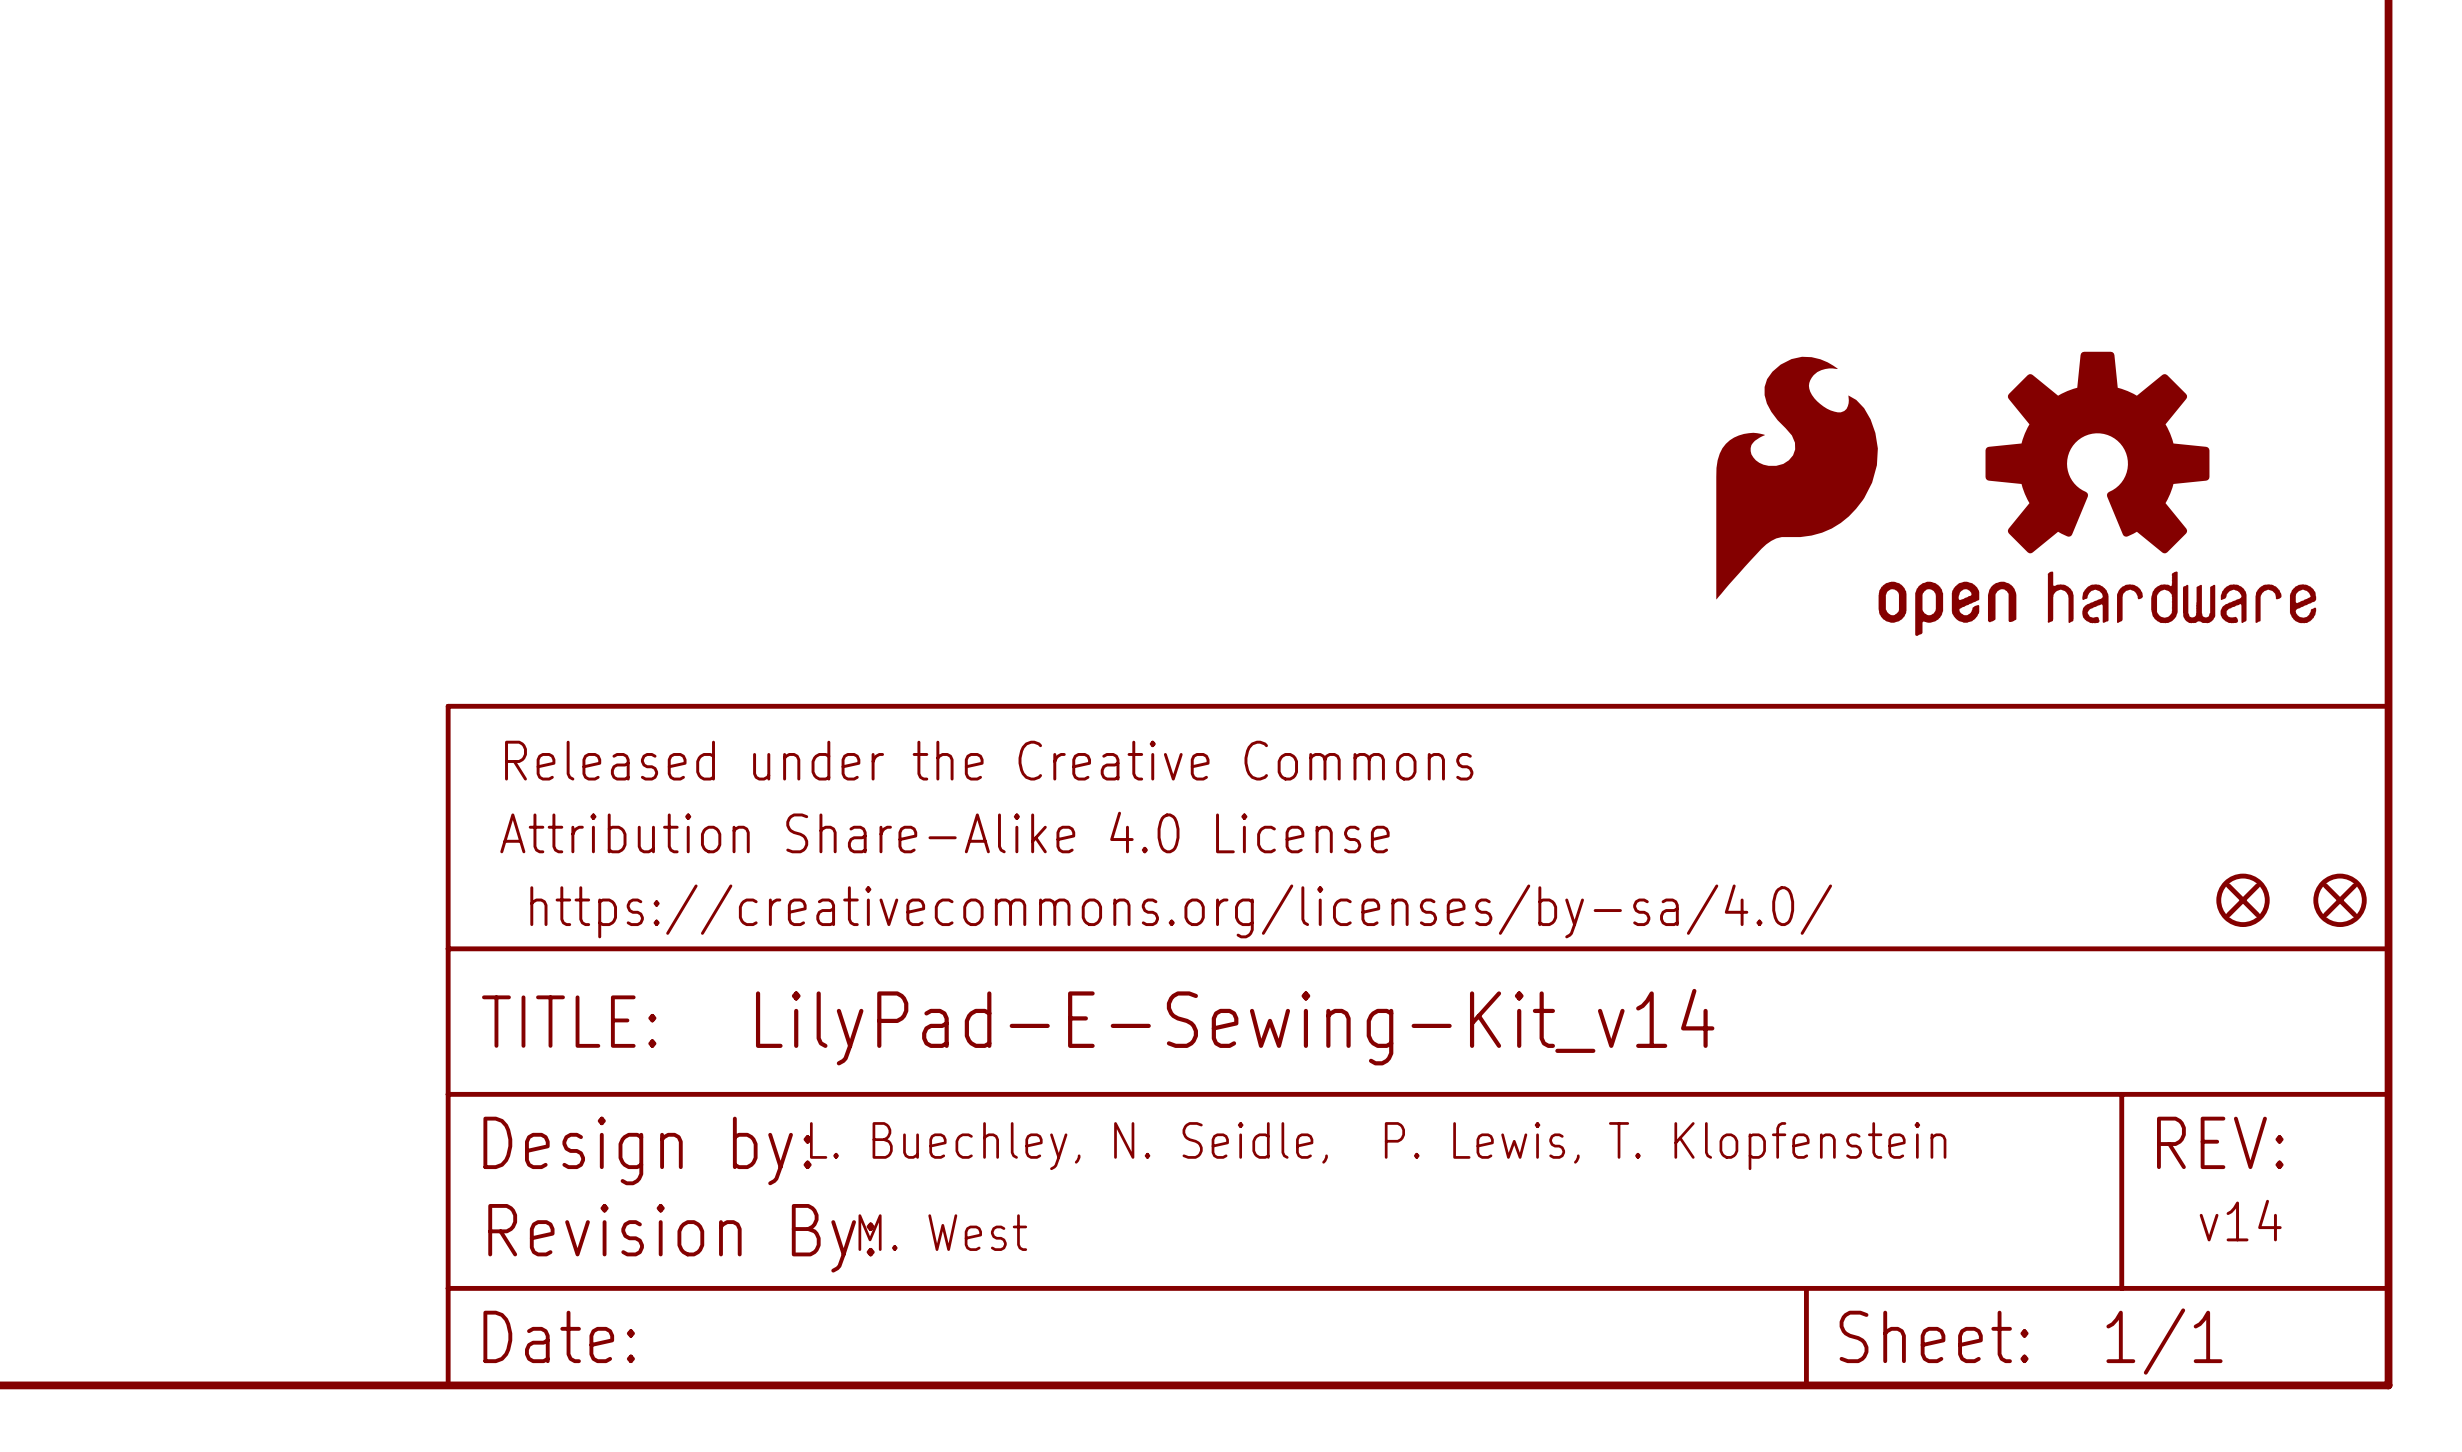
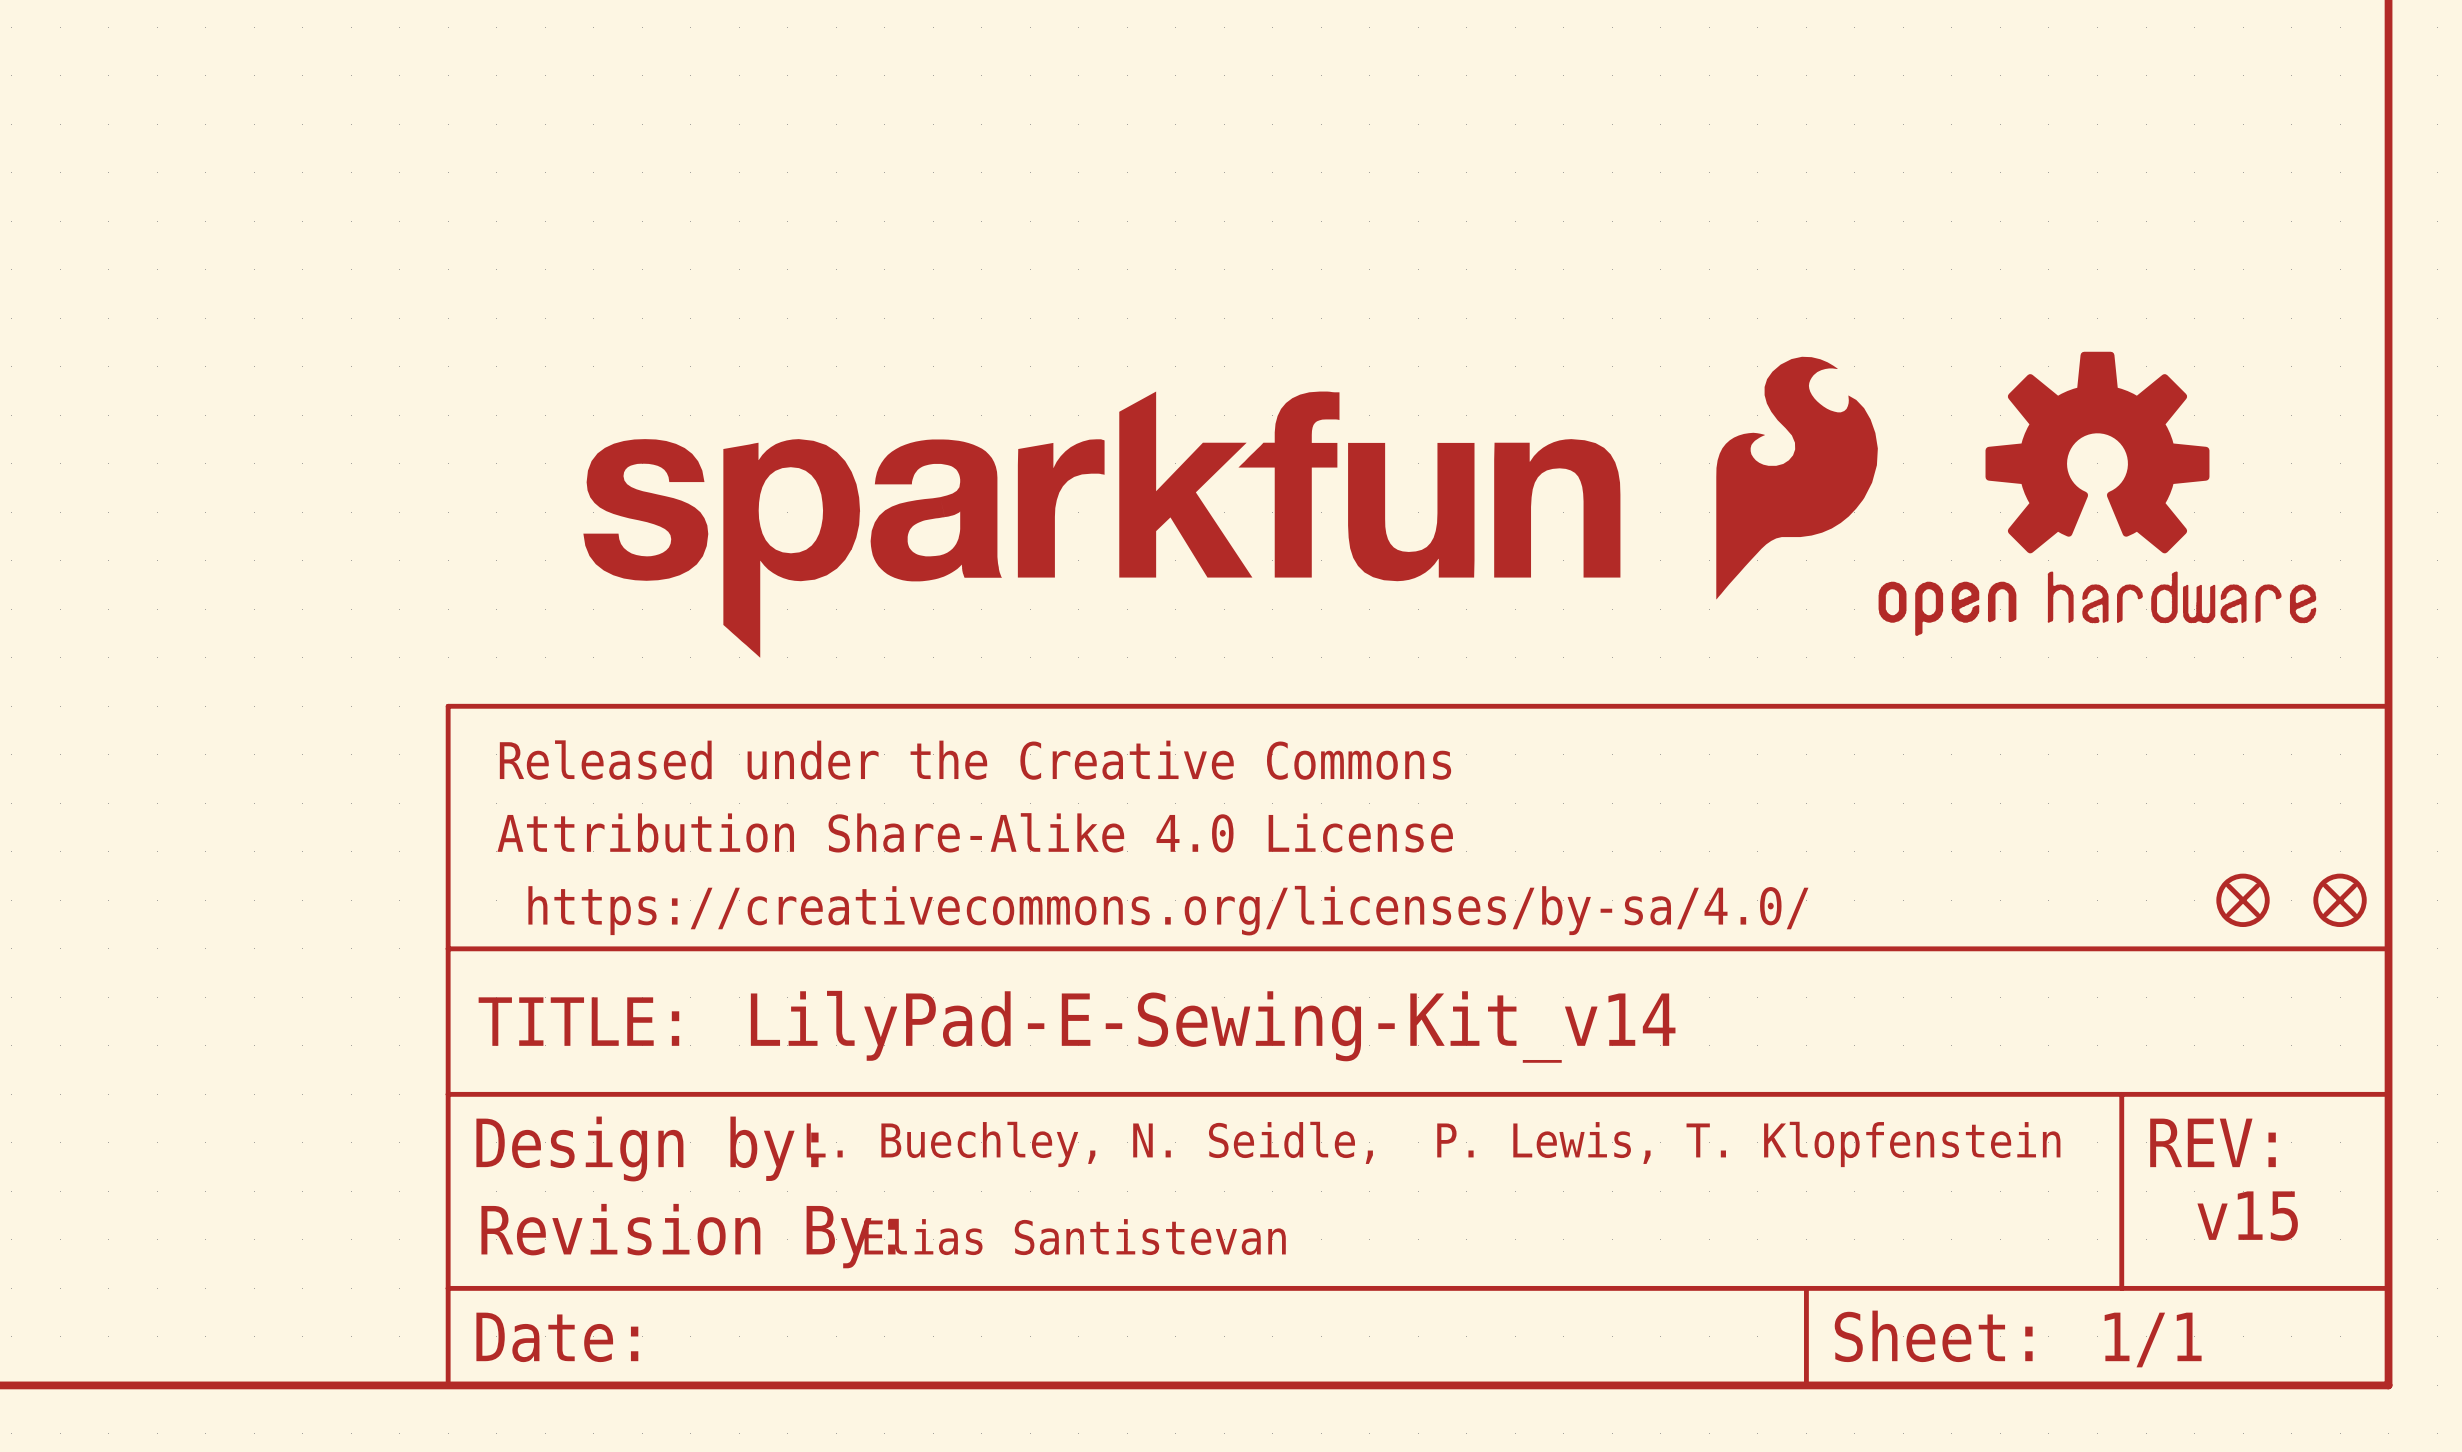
part: none -> (1101, 524)
text: v14 (2240, 1220) -> v15 (2247, 1216)
text: M. West (942, 1232) -> Elias Santistevan (1075, 1236)

